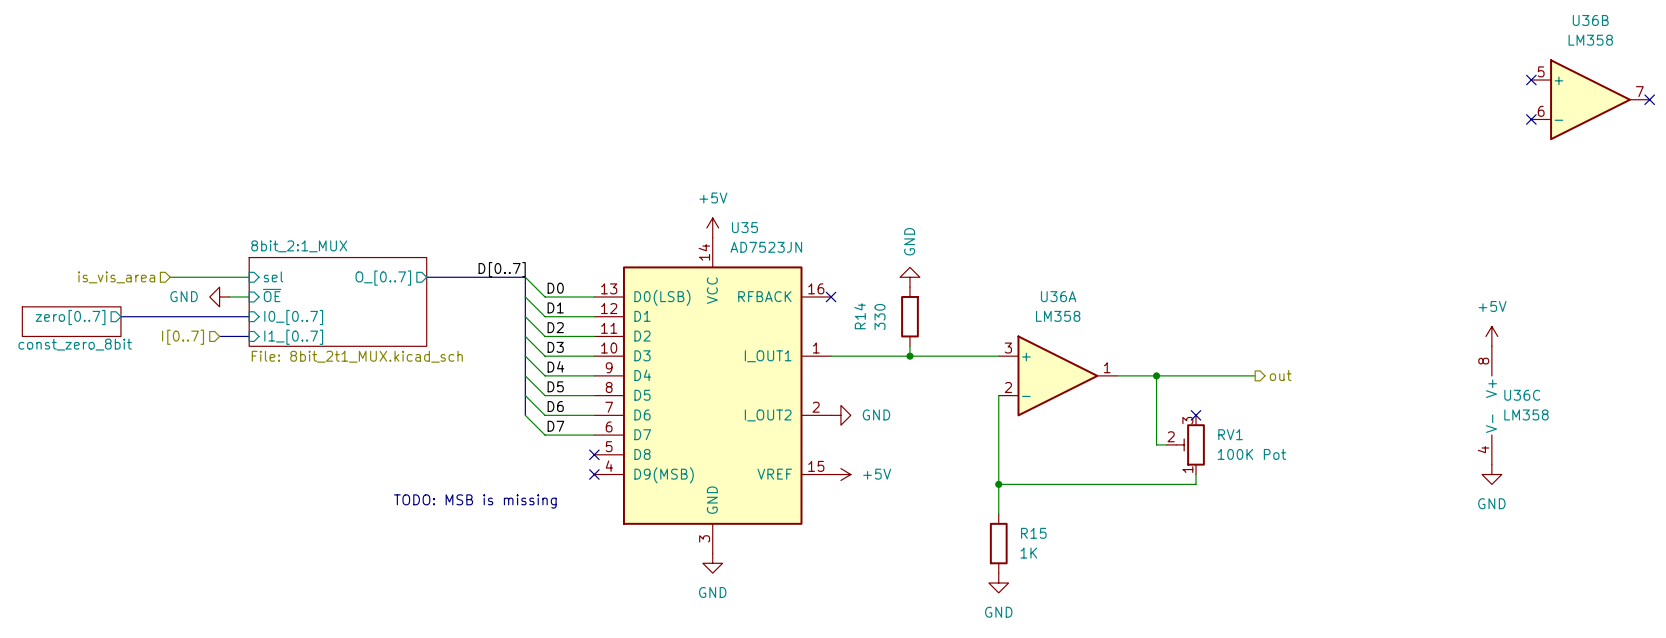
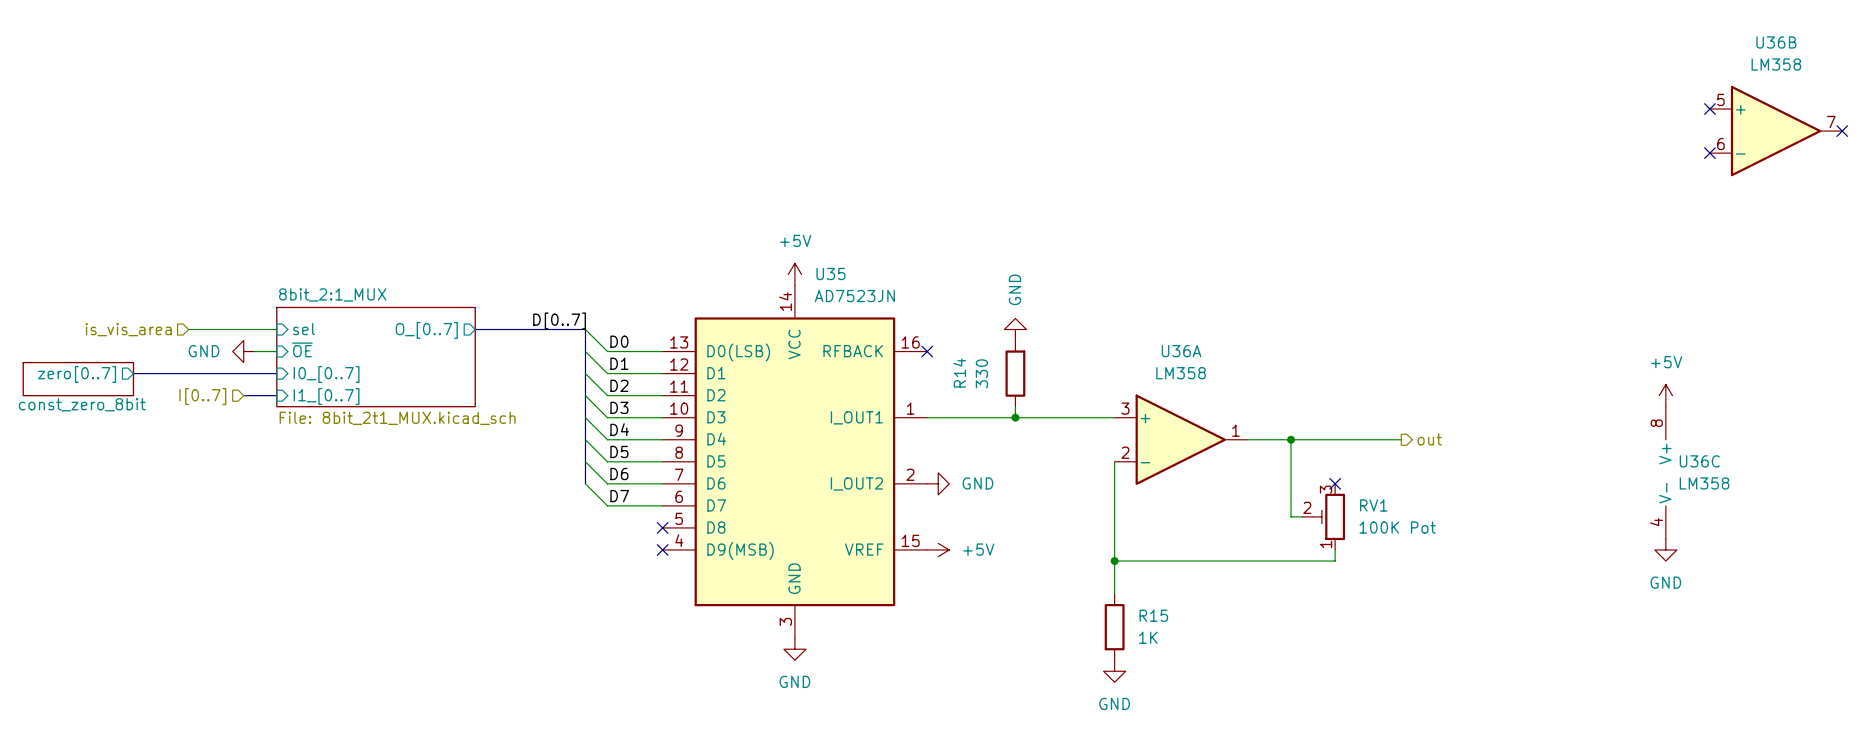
text: TODO: MSB is missing (475, 501) -> none

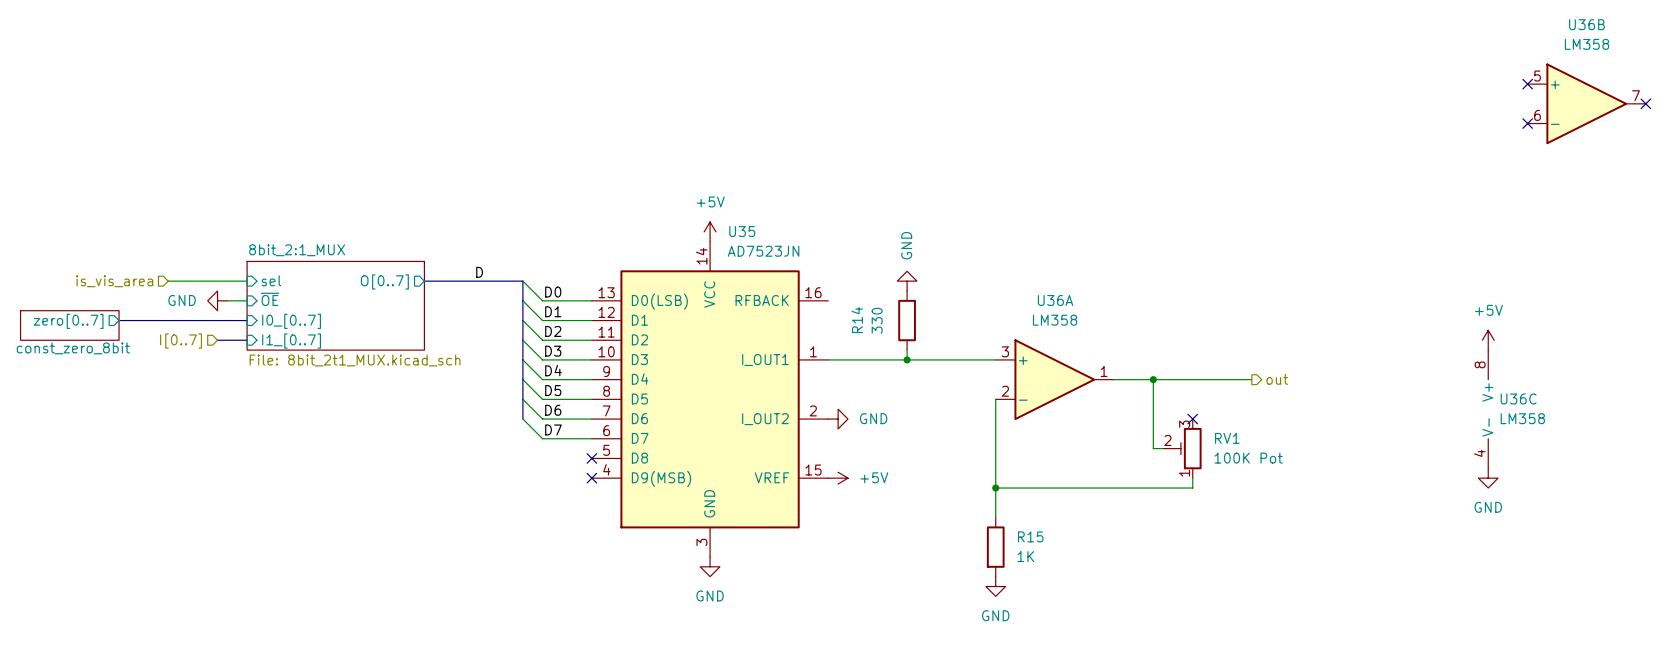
label: D[0..7] (559, 320) -> D (479, 272)
sheet pin: O_[0..7] (426, 330) -> O[0..7] (384, 281)
no-connect mark: (927, 351) -> none

